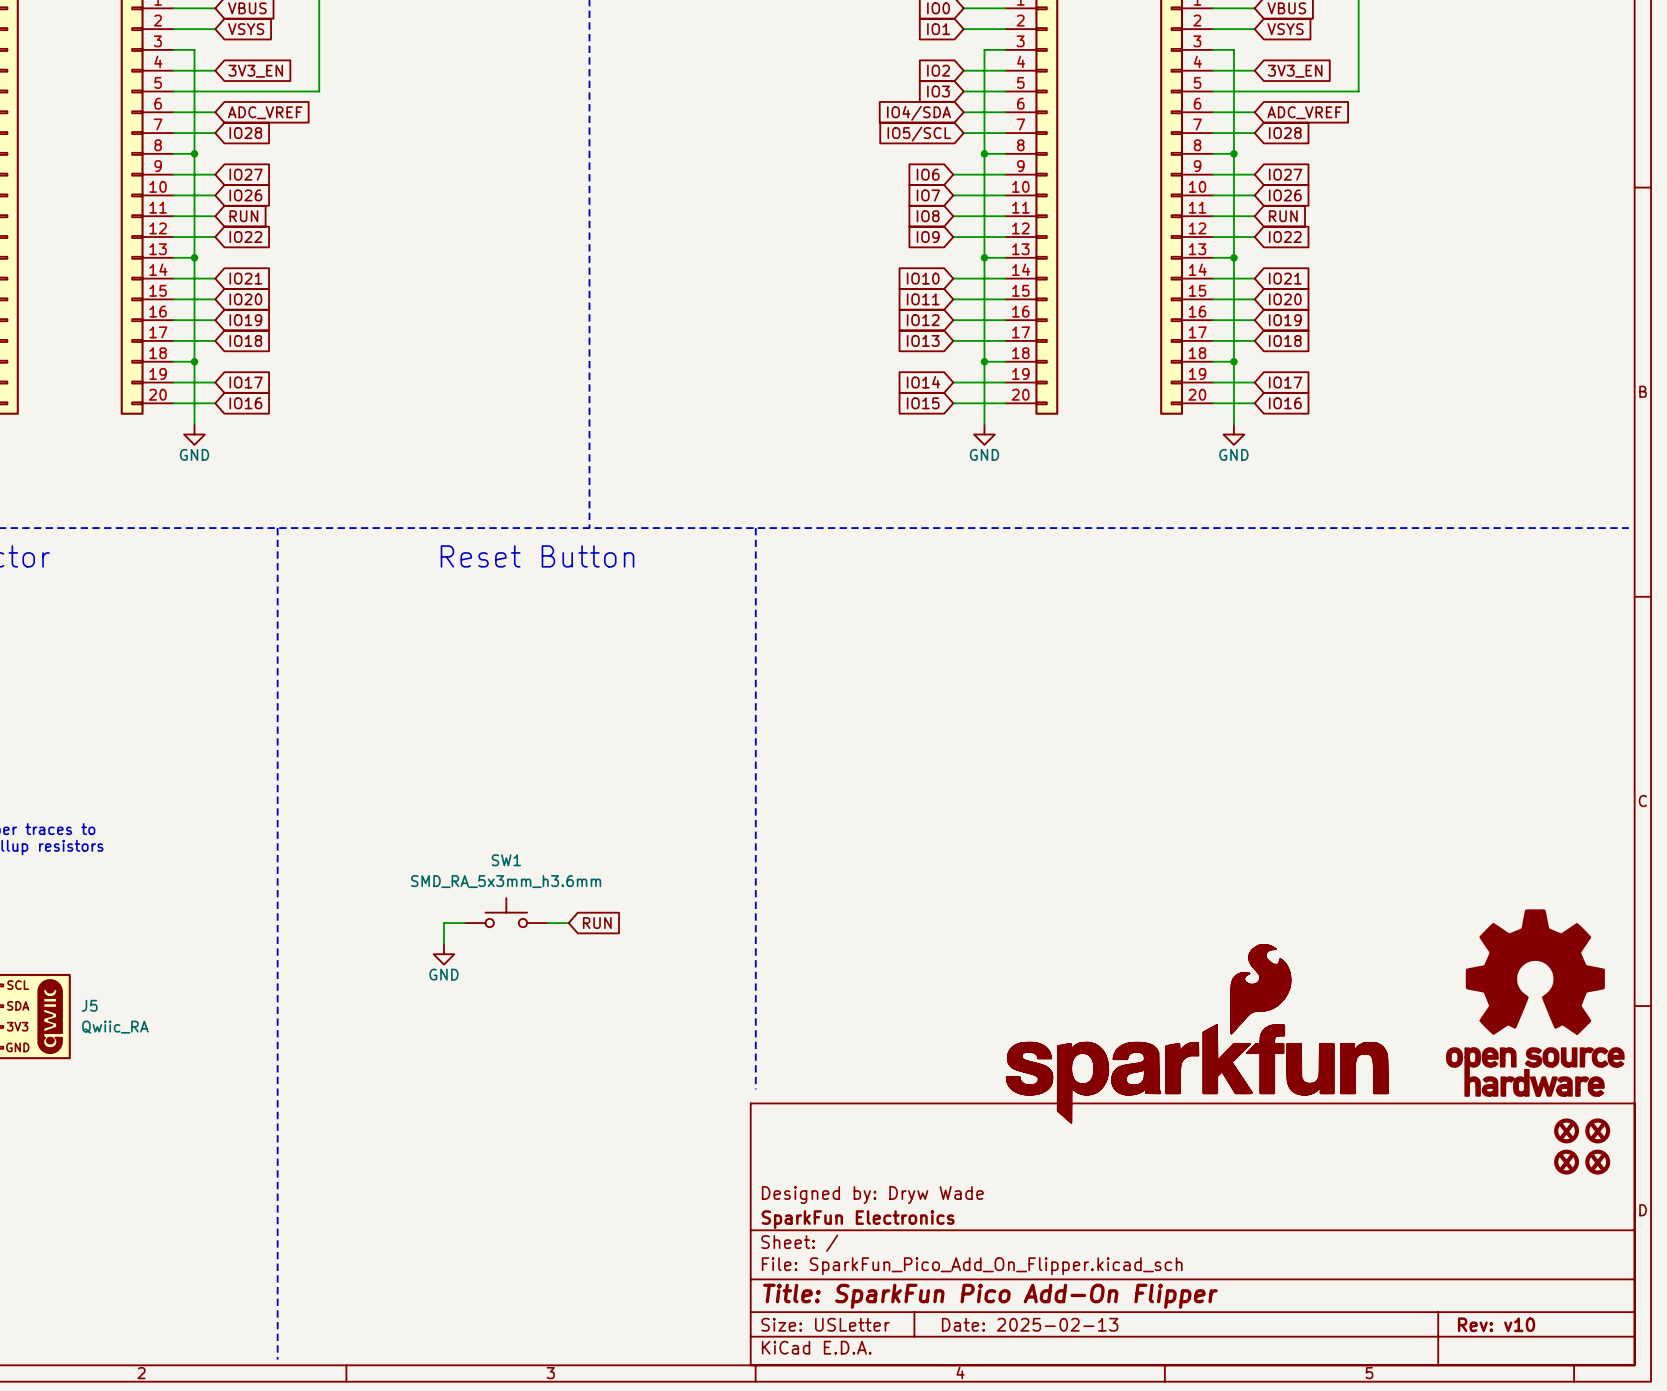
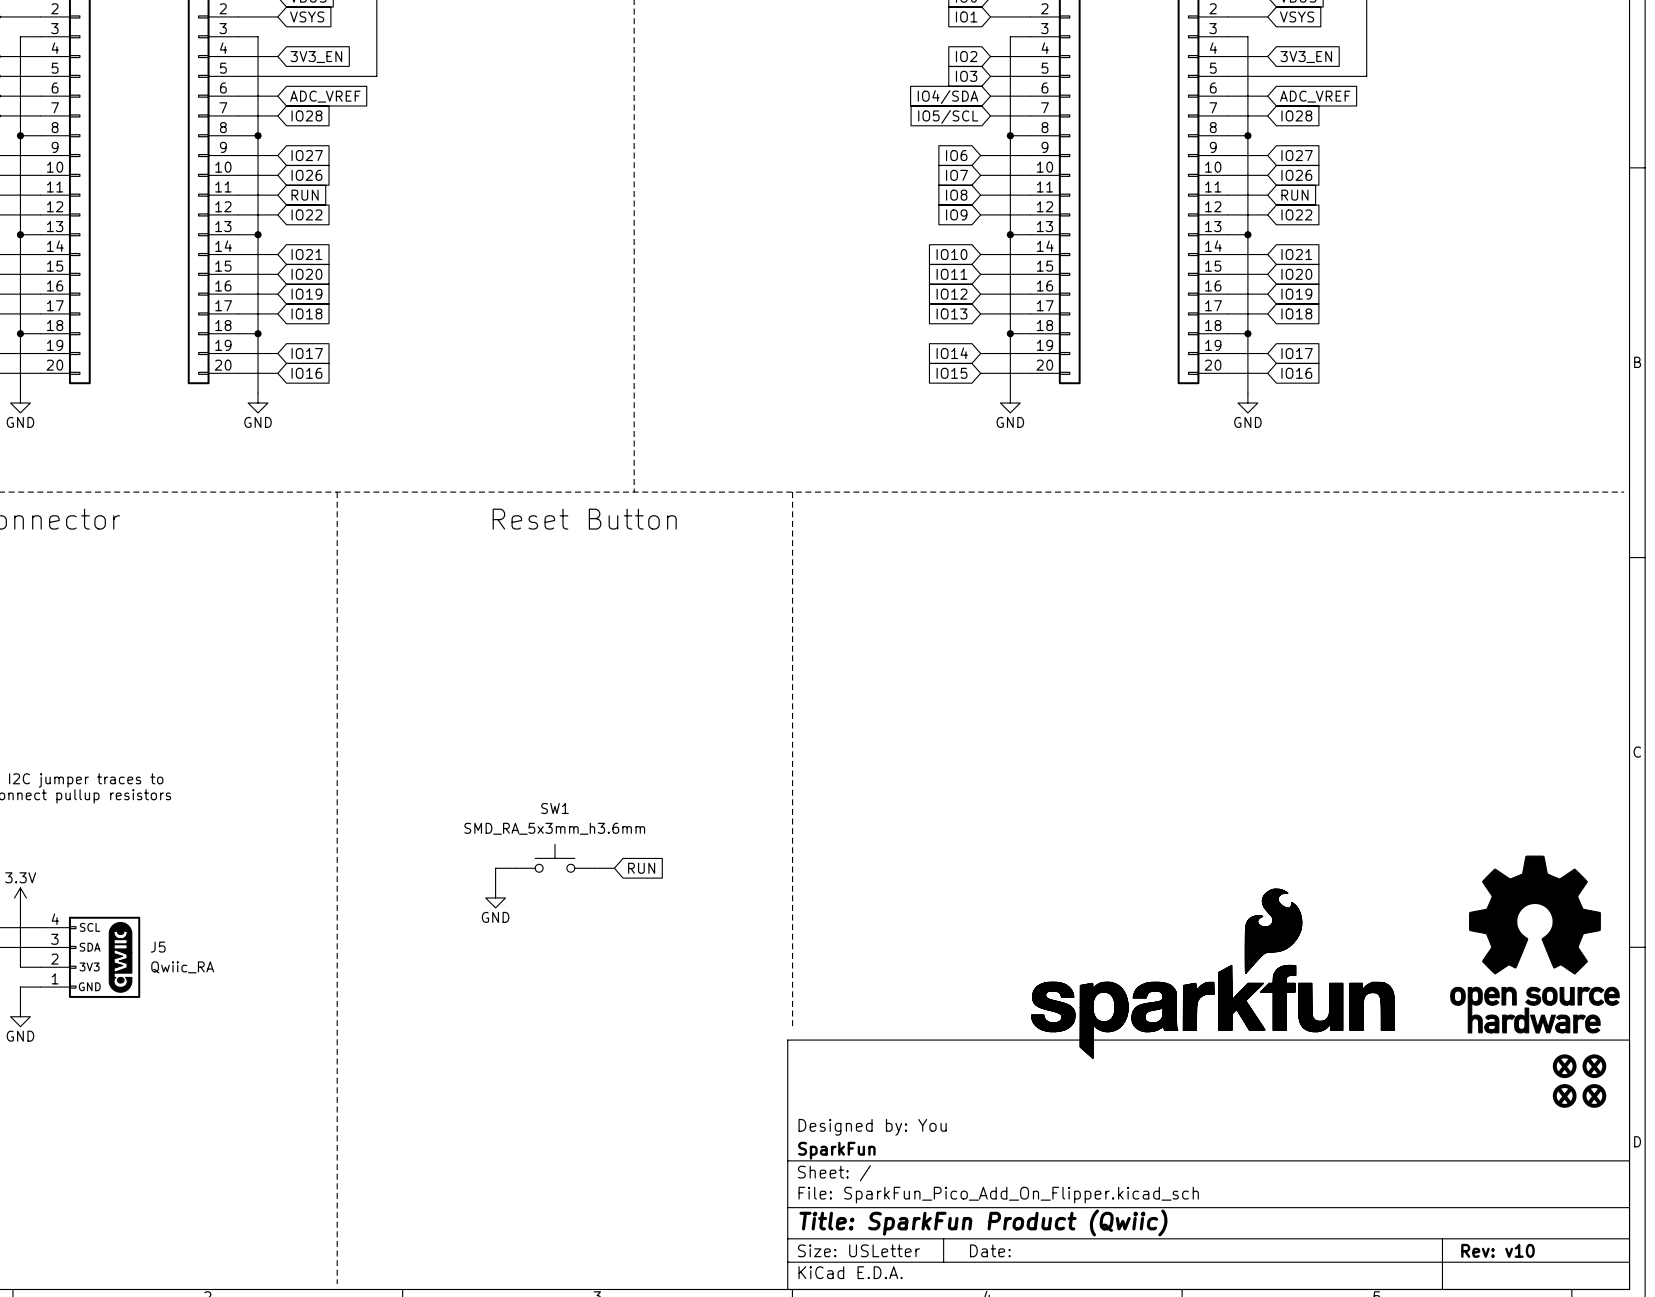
title block: Designed by: Dryw Wade (872, 1195) -> Designed by: You (872, 1127)
title block: SparkFun Electronics (858, 1219) -> SparkFun (836, 1150)
title block: Title: SparkFun Pico Add-On Flipper (990, 1296) -> Title: SparkFun Product (Qwiic) (983, 1222)
title block: Date: 2025-02-13 (1030, 1324) -> Date: (990, 1250)

